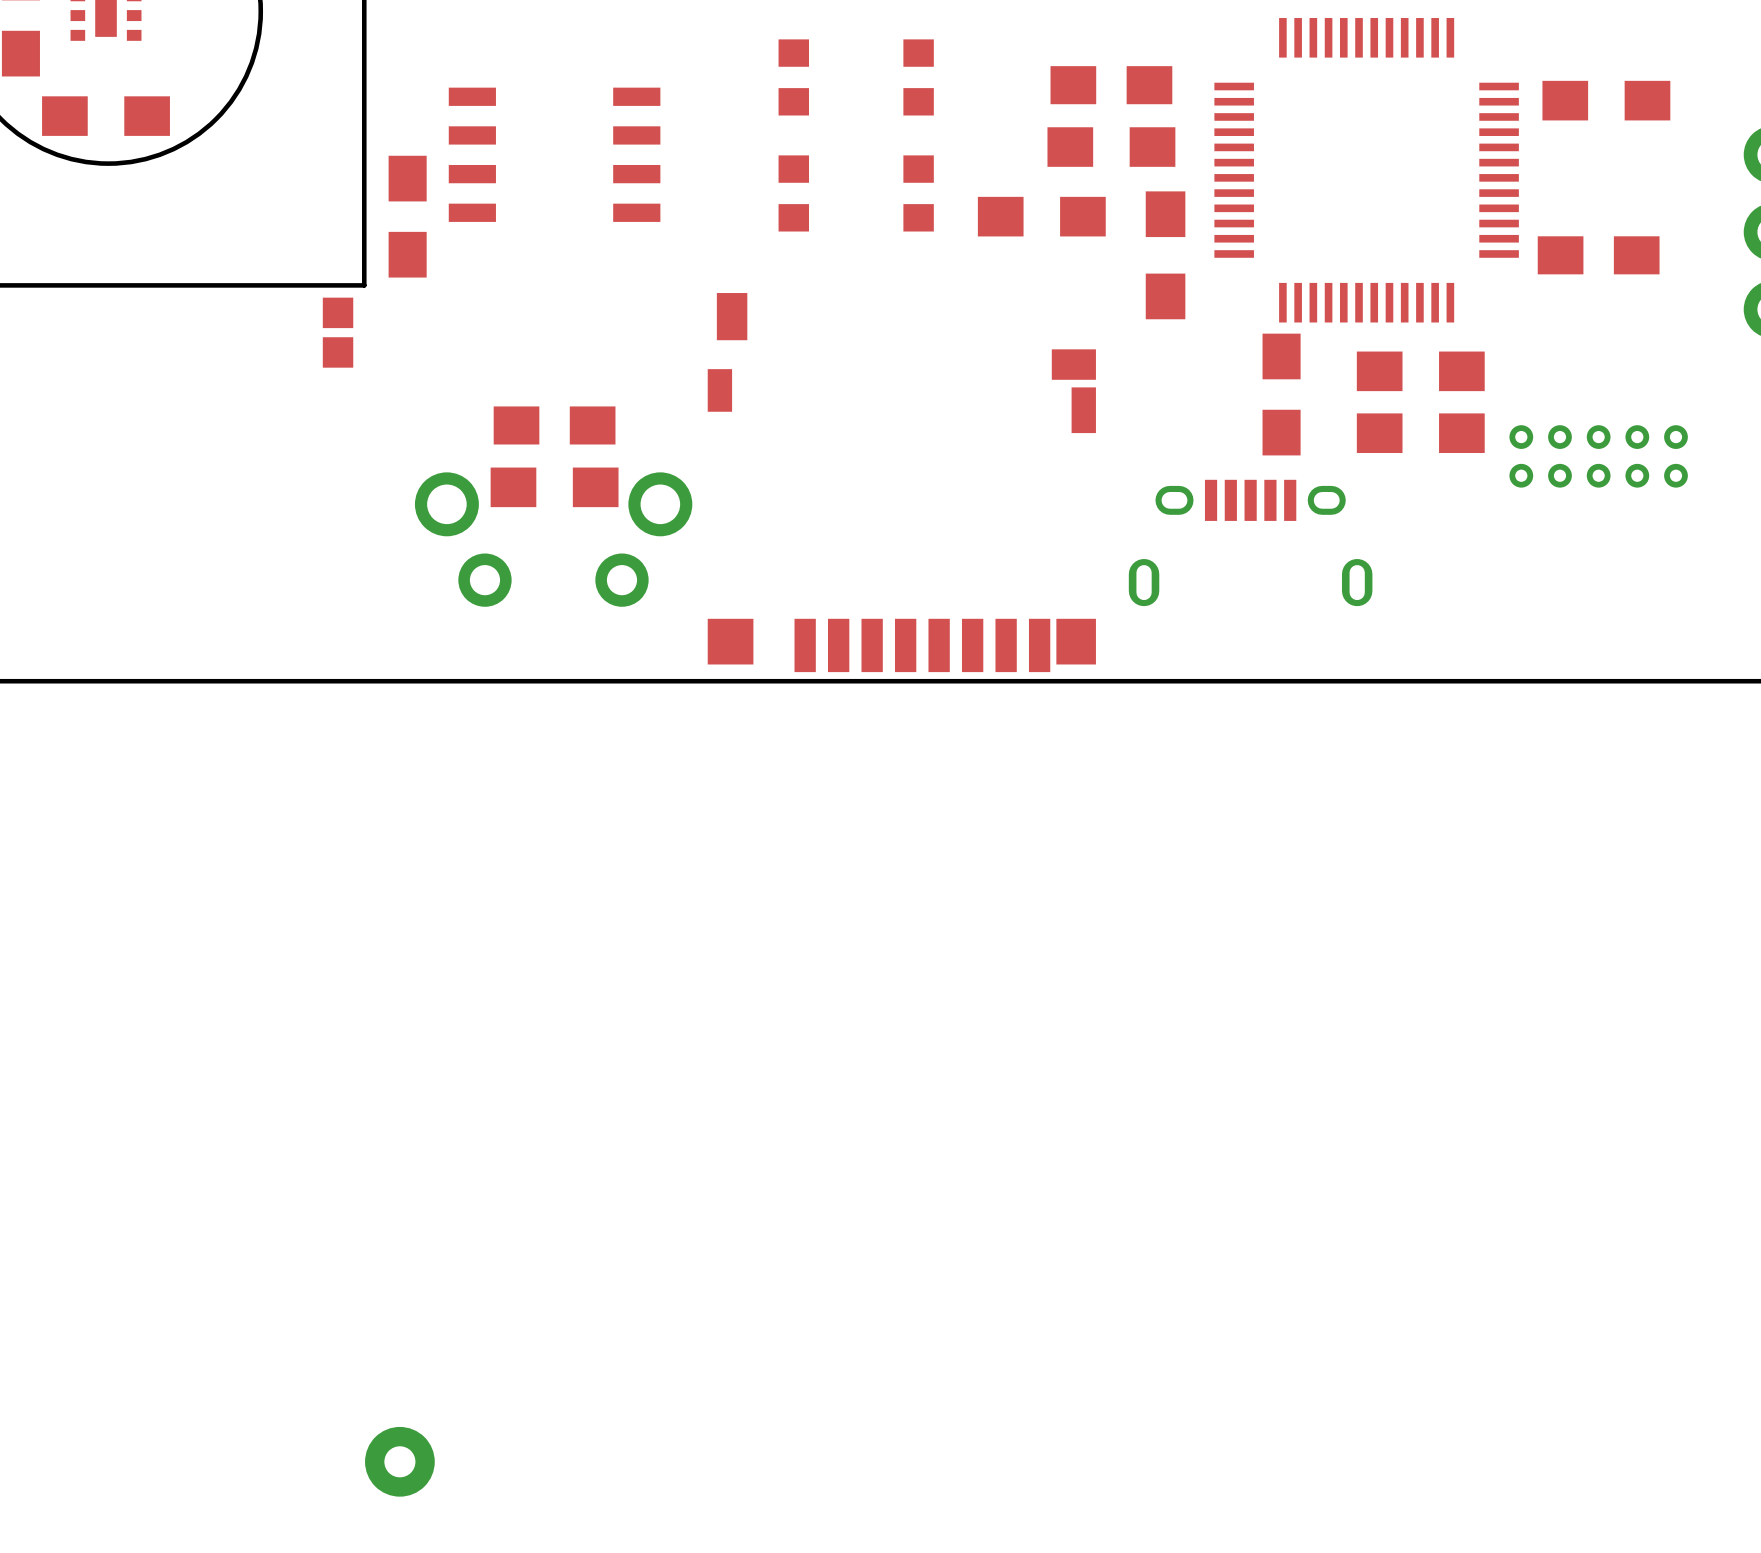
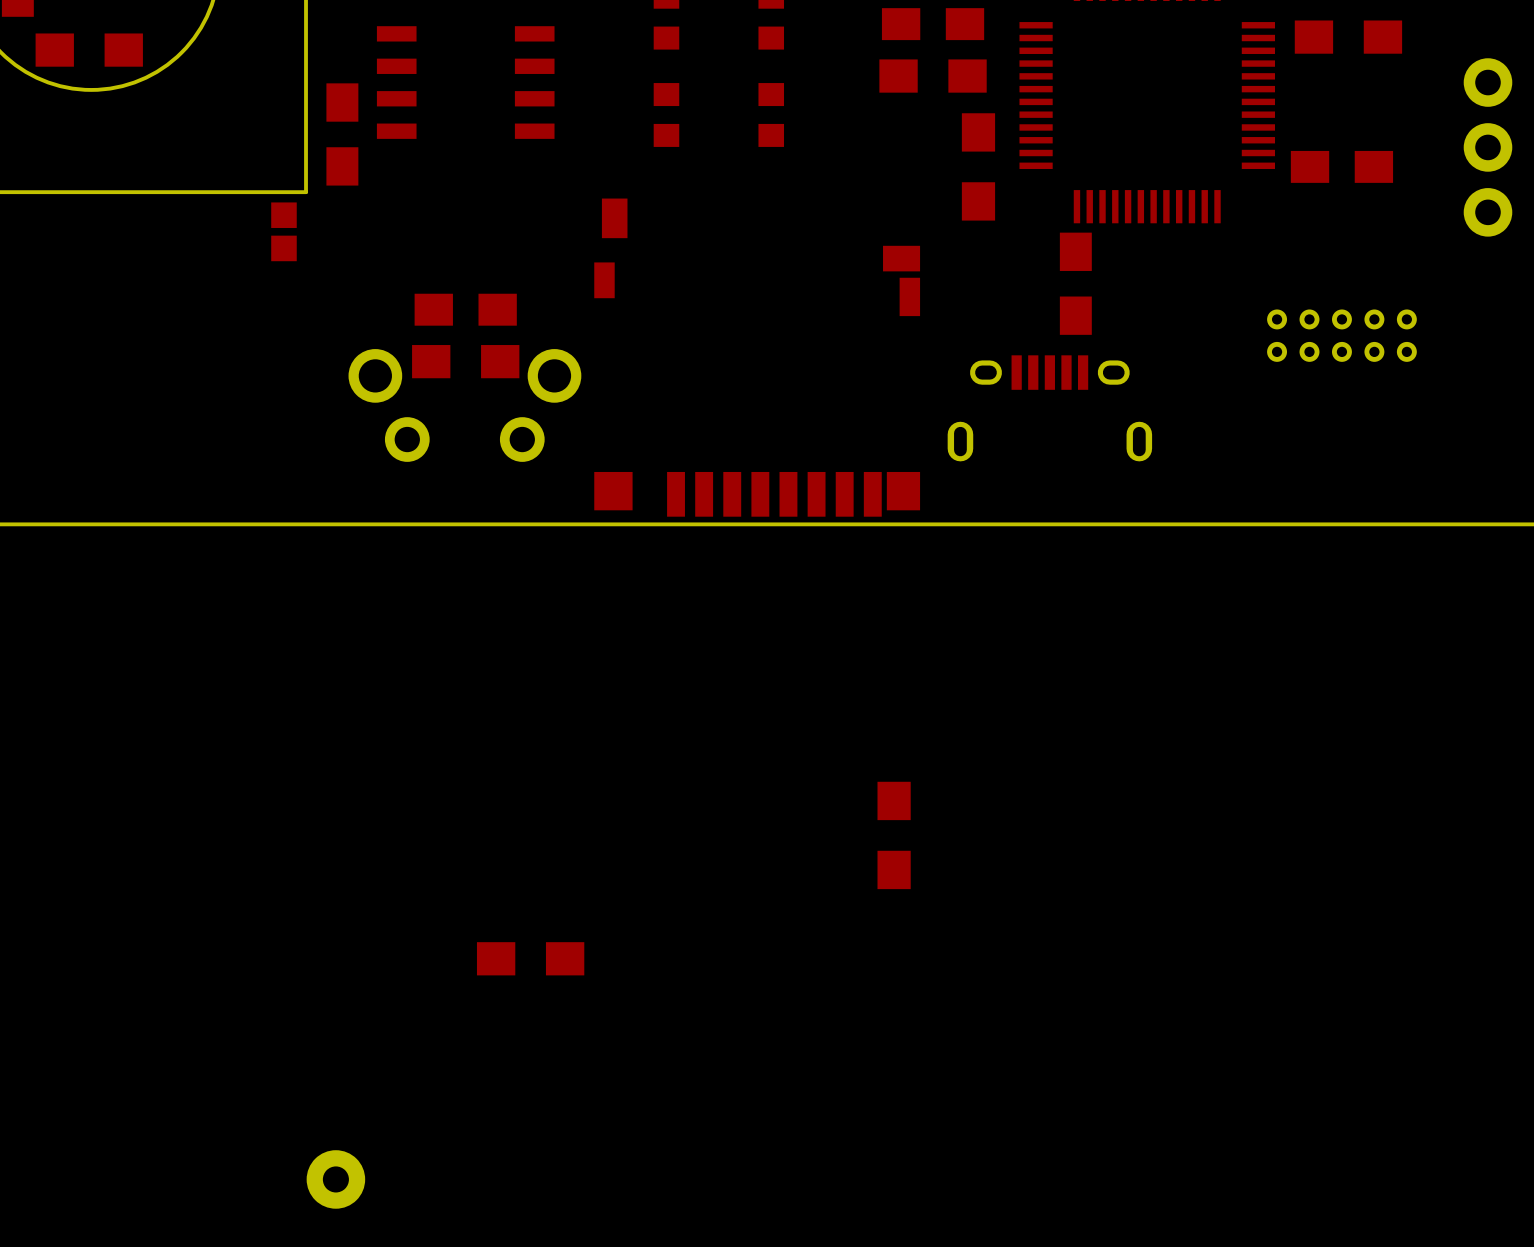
part: (1041, 216) -> none
part: (1420, 371) -> none
part: (1420, 433) -> none
part: none -> (894, 835)
part: none -> (530, 958)

